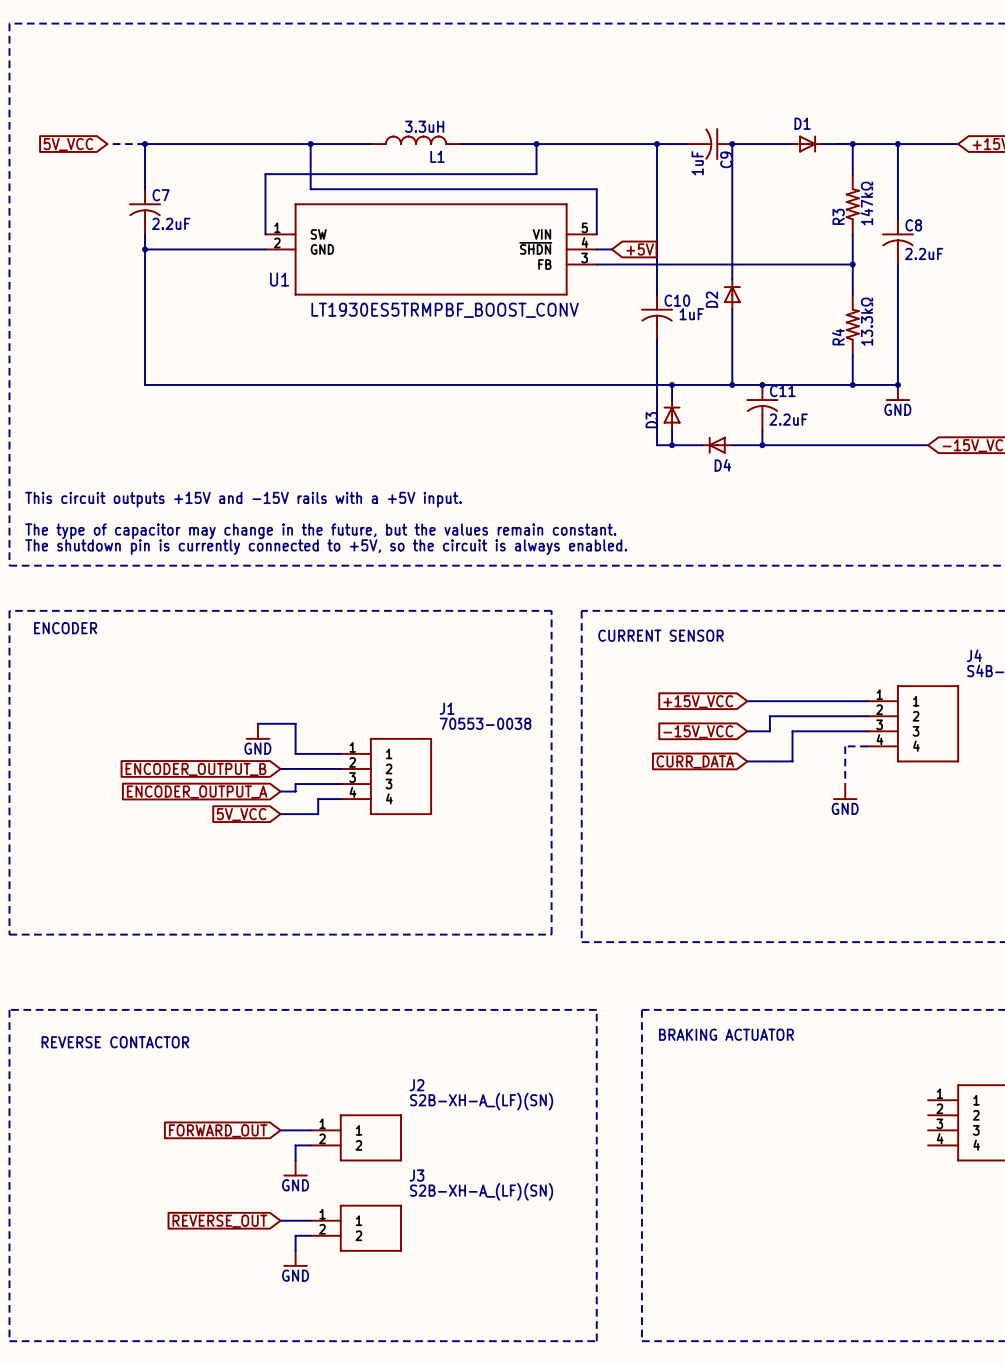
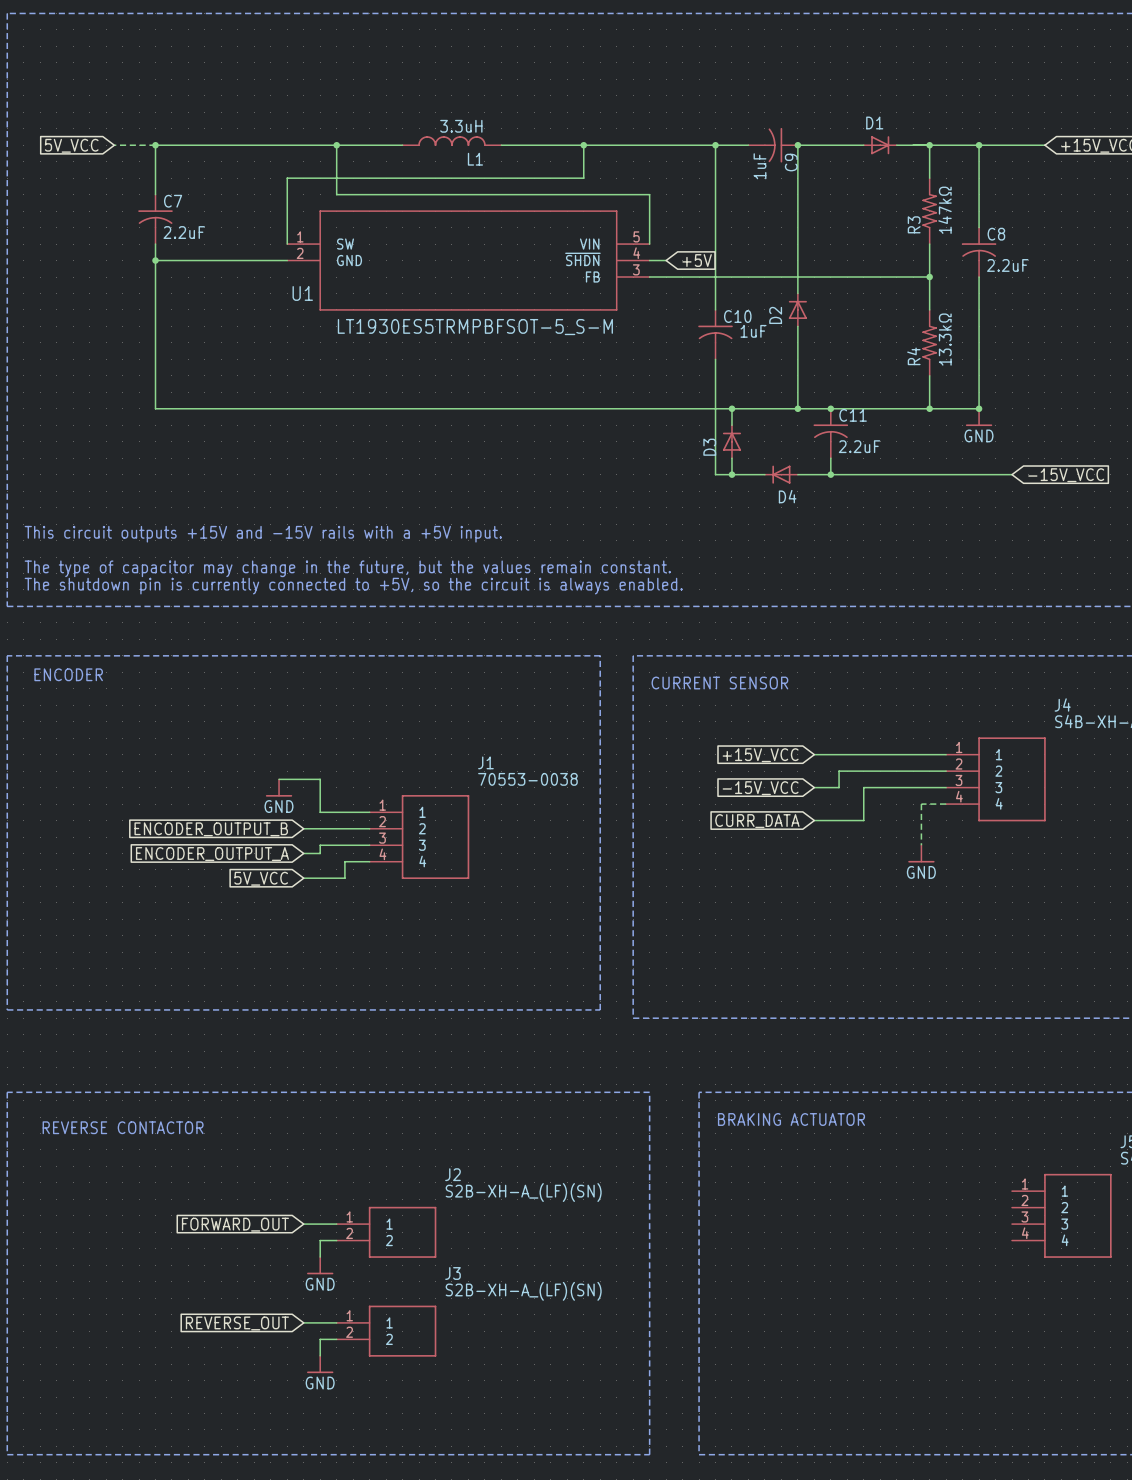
U1 value: LT1930ES5TRMPBF_BOOST_CONV (445, 310) -> LT1930ES5TRMPBFSOT-5_S-M (475, 327)

